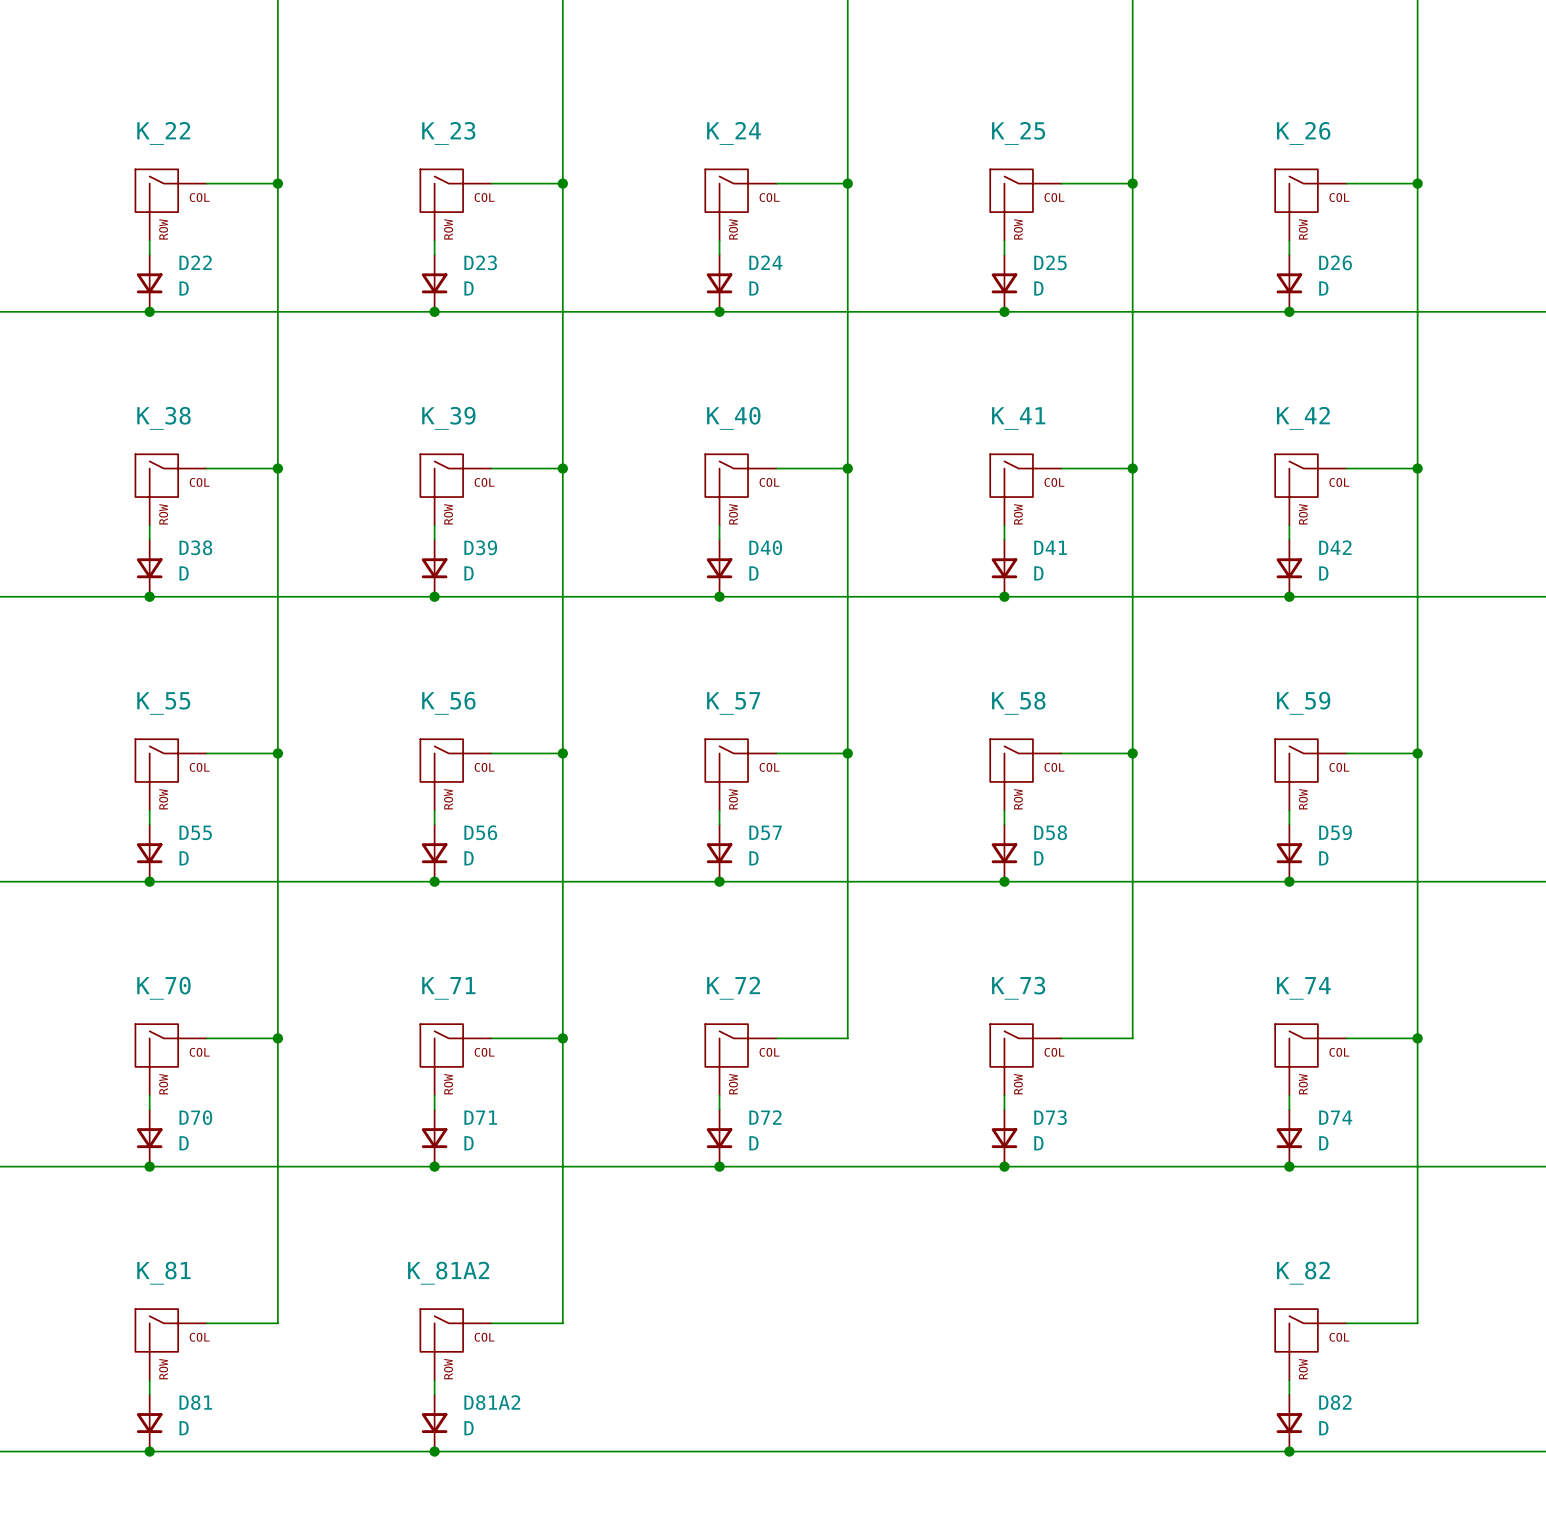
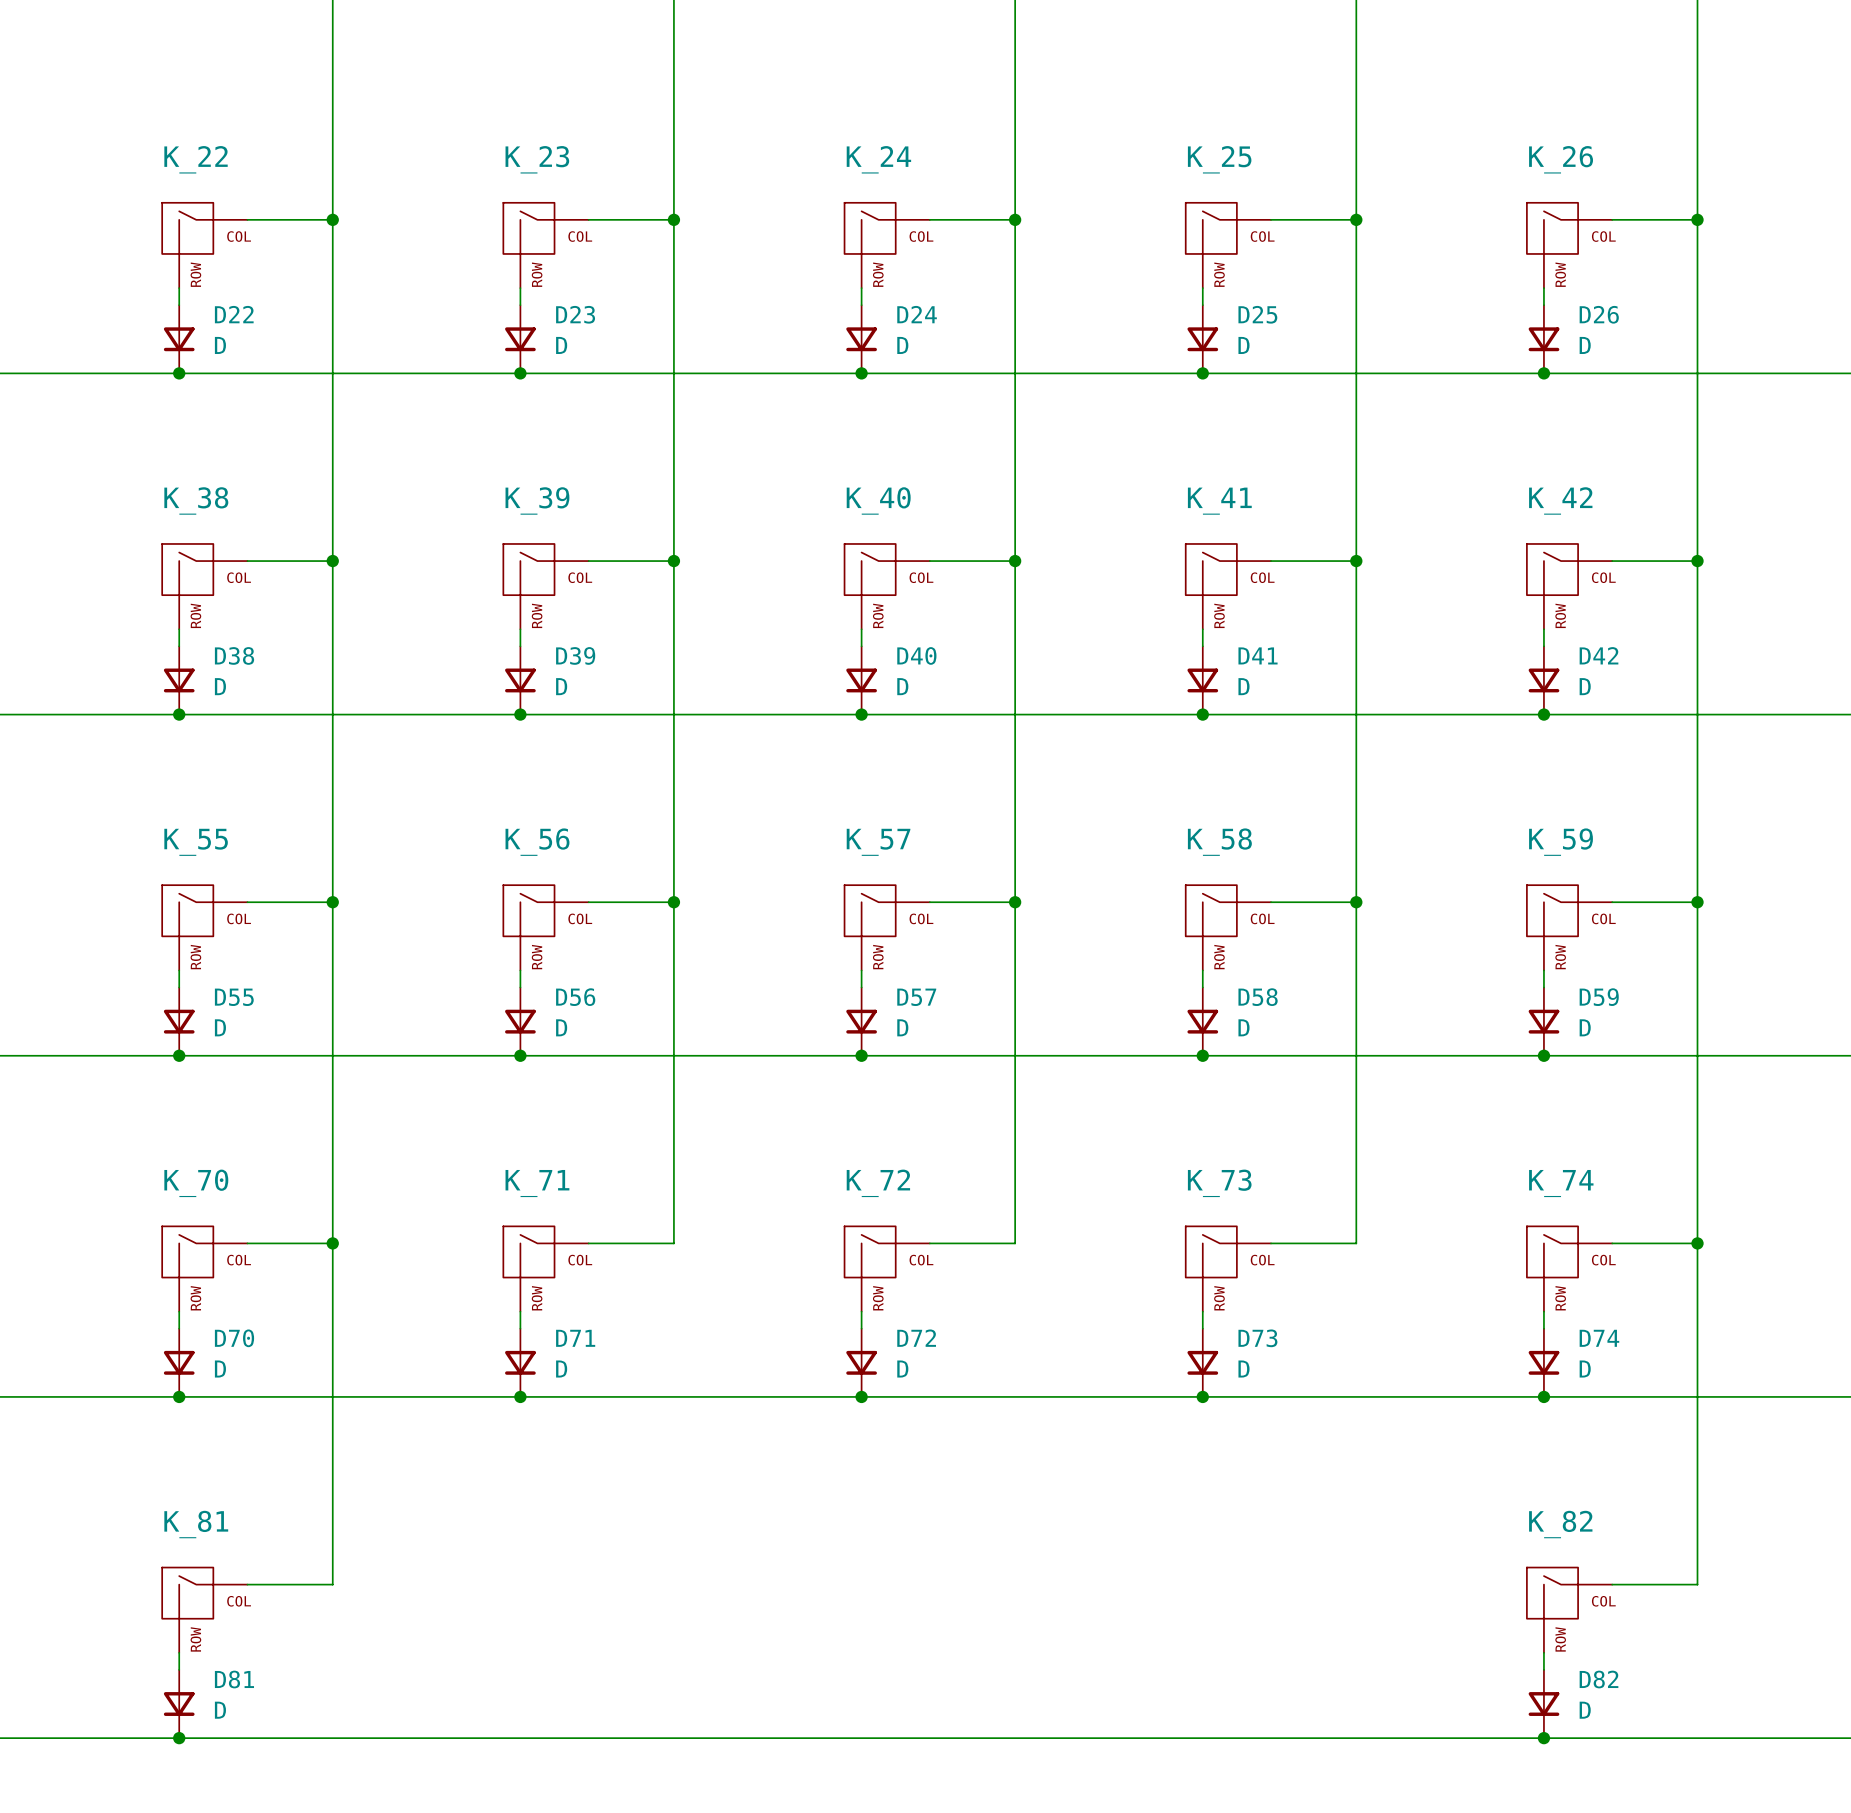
wire: (562, 1038) (562, 1323) (491, 1323) -> none
junction: (562, 1038) -> none
K_81A2: (455, 1344) -> none
wire: (434, 1380) (434, 1394) -> none
D81A2: D (434, 1423) -> none
junction: (434, 1451) -> none

